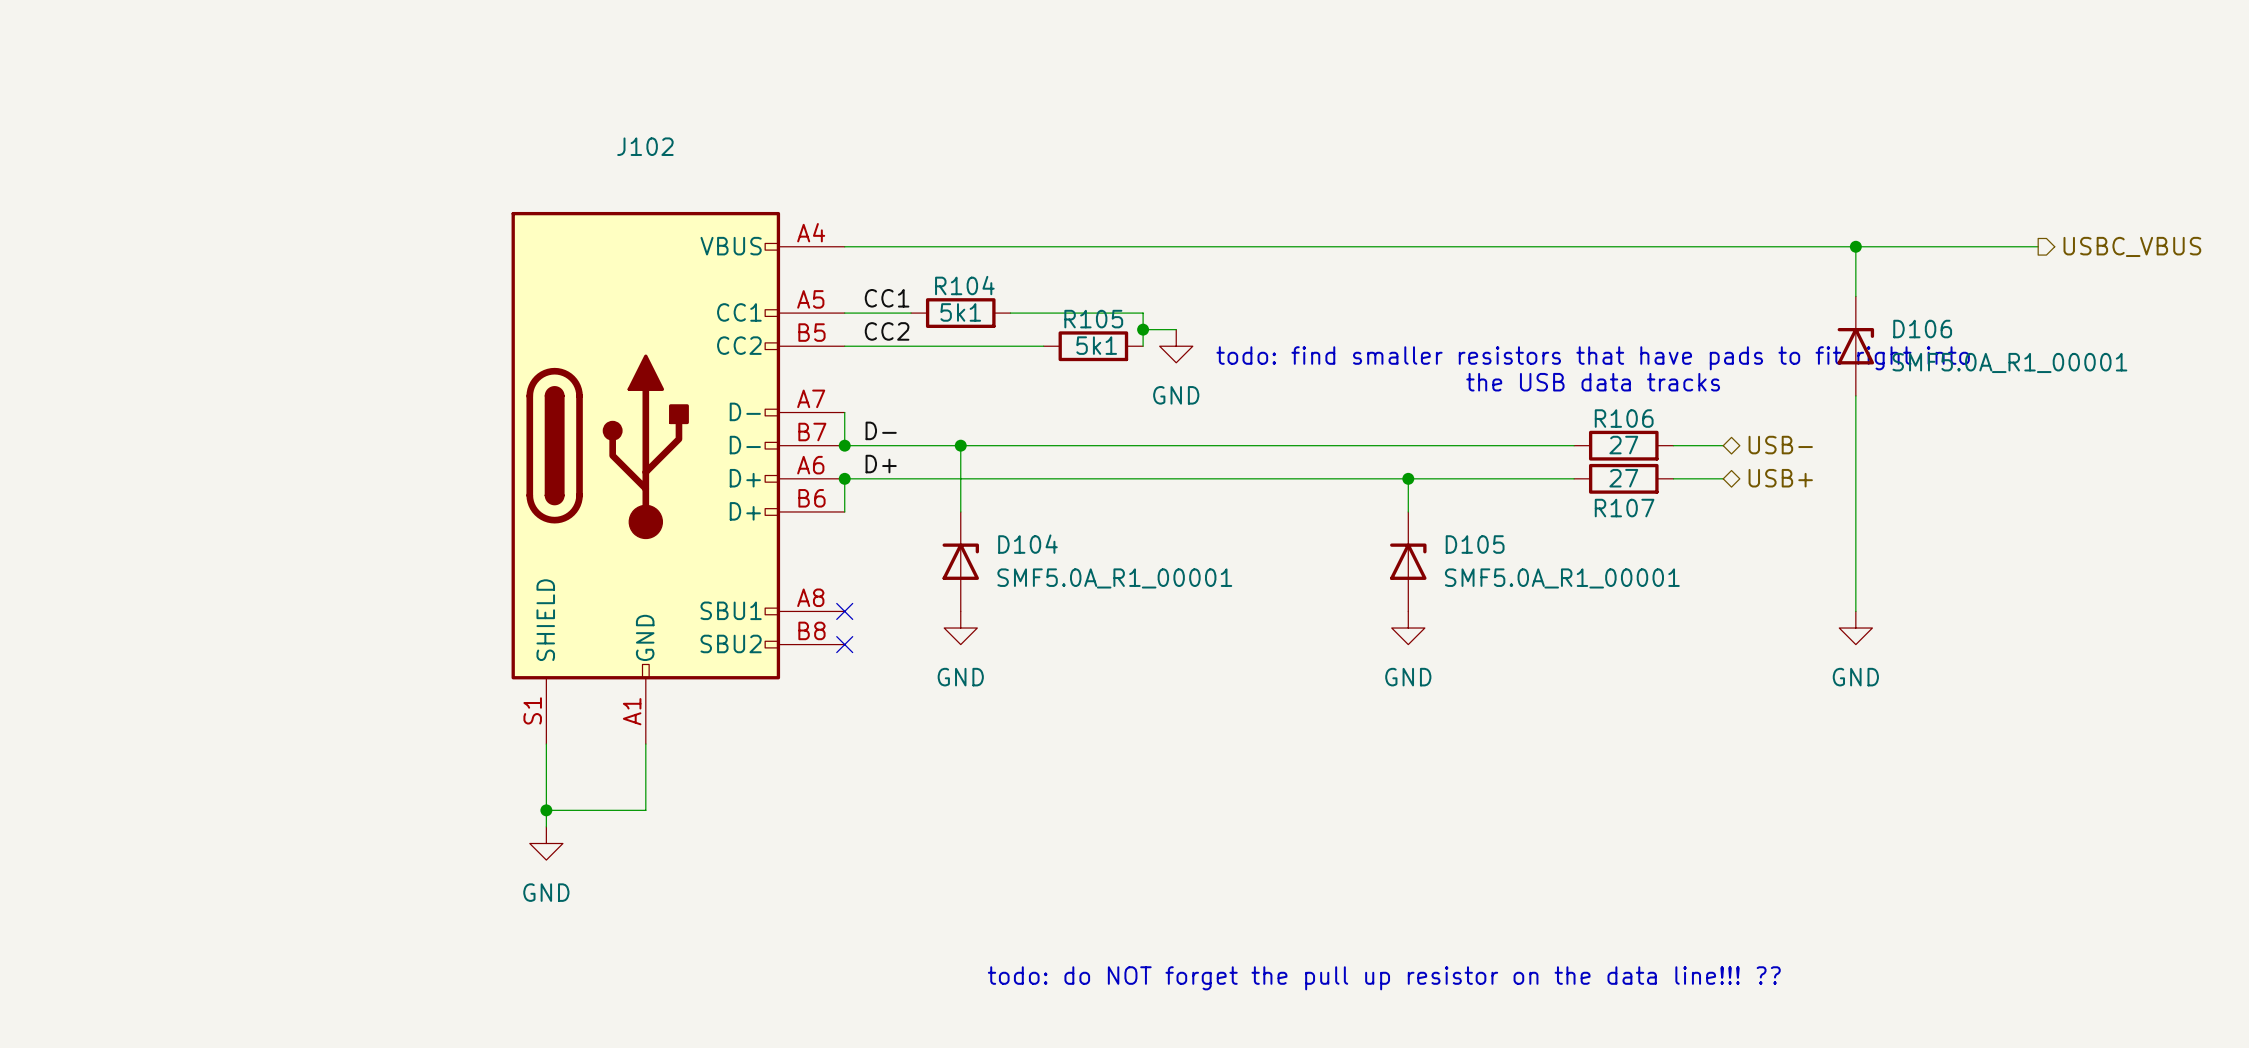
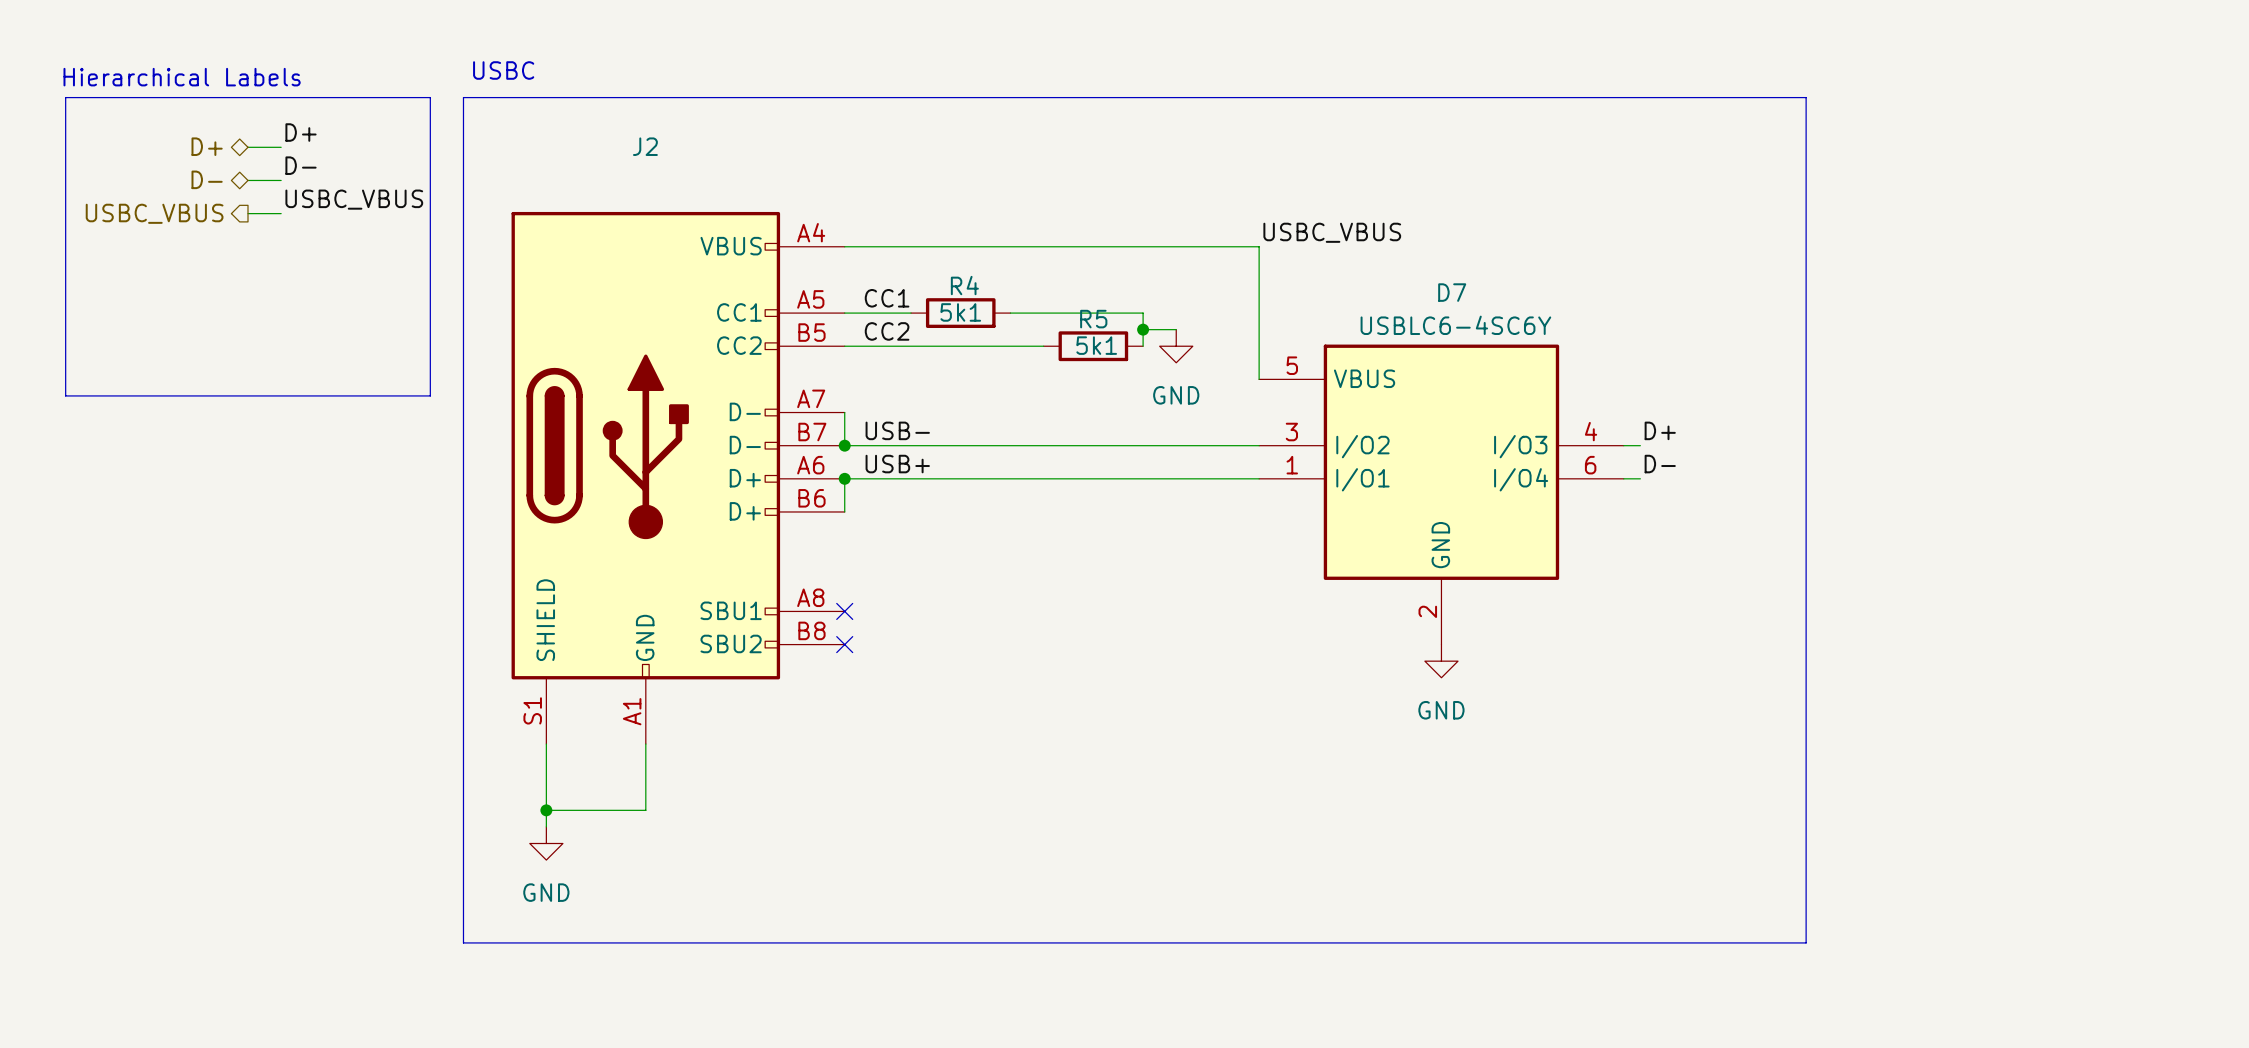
text: none -> USBC (503, 70)
text: none -> Hierarchical Labels (182, 77)
line: none -> (65, 97) (430, 97) (430, 395) (65, 395) (65, 97)
line: none -> (463, 97) (1806, 97) (1806, 942) (463, 942) (463, 97)
label: none -> D+ (301, 132)
hierarchical label: none -> D+ (207, 146)
J102 name: J102 (645, 146) -> J2 (645, 146)
wire: none -> (248, 147) (281, 147)
label: none -> D- (301, 165)
hierarchical label: none -> D- (207, 179)
wire: none -> (248, 180) (281, 180)
label: none -> USBC_VBUS (354, 199)
hierarchical label: none -> USBC_VBUS (154, 213)
wire: none -> (248, 213) (281, 213)
label: none -> USBC_VBUS (1332, 232)
wire: (1259, 246) (2038, 246) -> (1259, 246) (1259, 379)
wire: (1855, 246) (1855, 296) -> none
junction: (1855, 246) -> none
hierarchical label: USBC_VBUS (2132, 246) -> none
R104 name: R104 (964, 285) -> R4 (964, 285)
R105 name: R105 (1093, 319) -> R5 (1093, 319)
D106: SMF5.0A_R1_00001 (1855, 346) -> none
text: todo: find smaller resistors that have pads to fit right into (1593, 358) -> none
text: the USB data tracks (1593, 382) -> none
wire: (1855, 395) (1855, 611) -> none
label: D- (881, 430) -> USB- (897, 430)
label: none -> D+ (1660, 430)
wire: (960, 445) (960, 511) -> none
junction: (960, 445) -> none
wire: none -> (1623, 445) (1640, 445)
R106: 27 (1623, 445) -> none
wire: (1673, 445) (1723, 445) -> none
hierarchical label: USB- (1780, 445) -> none
label: D+ (881, 464) -> USB+ (897, 464)
label: none -> D- (1660, 464)
junction: (1408, 478) -> none
wire: none -> (1623, 478) (1640, 478)
R107: 27 (1623, 478) -> none
wire: (1673, 478) (1723, 478) -> none
hierarchical label: USB+ (1780, 478) -> none
D7: none -> USBLC6-4SC6Y (1441, 494)
D104: SMF5.0A_R1_00001 (960, 561) -> none
D105: SMF5.0A_R1_00001 (1408, 561) -> none
power symbol: GND (960, 628) -> none
power symbol position: GND (1408, 628) -> GND (1441, 661)
power symbol: GND (1855, 628) -> none
text: todo: do NOT forget the pull up resistor on the data line!!! ?? (1384, 978) -> none

